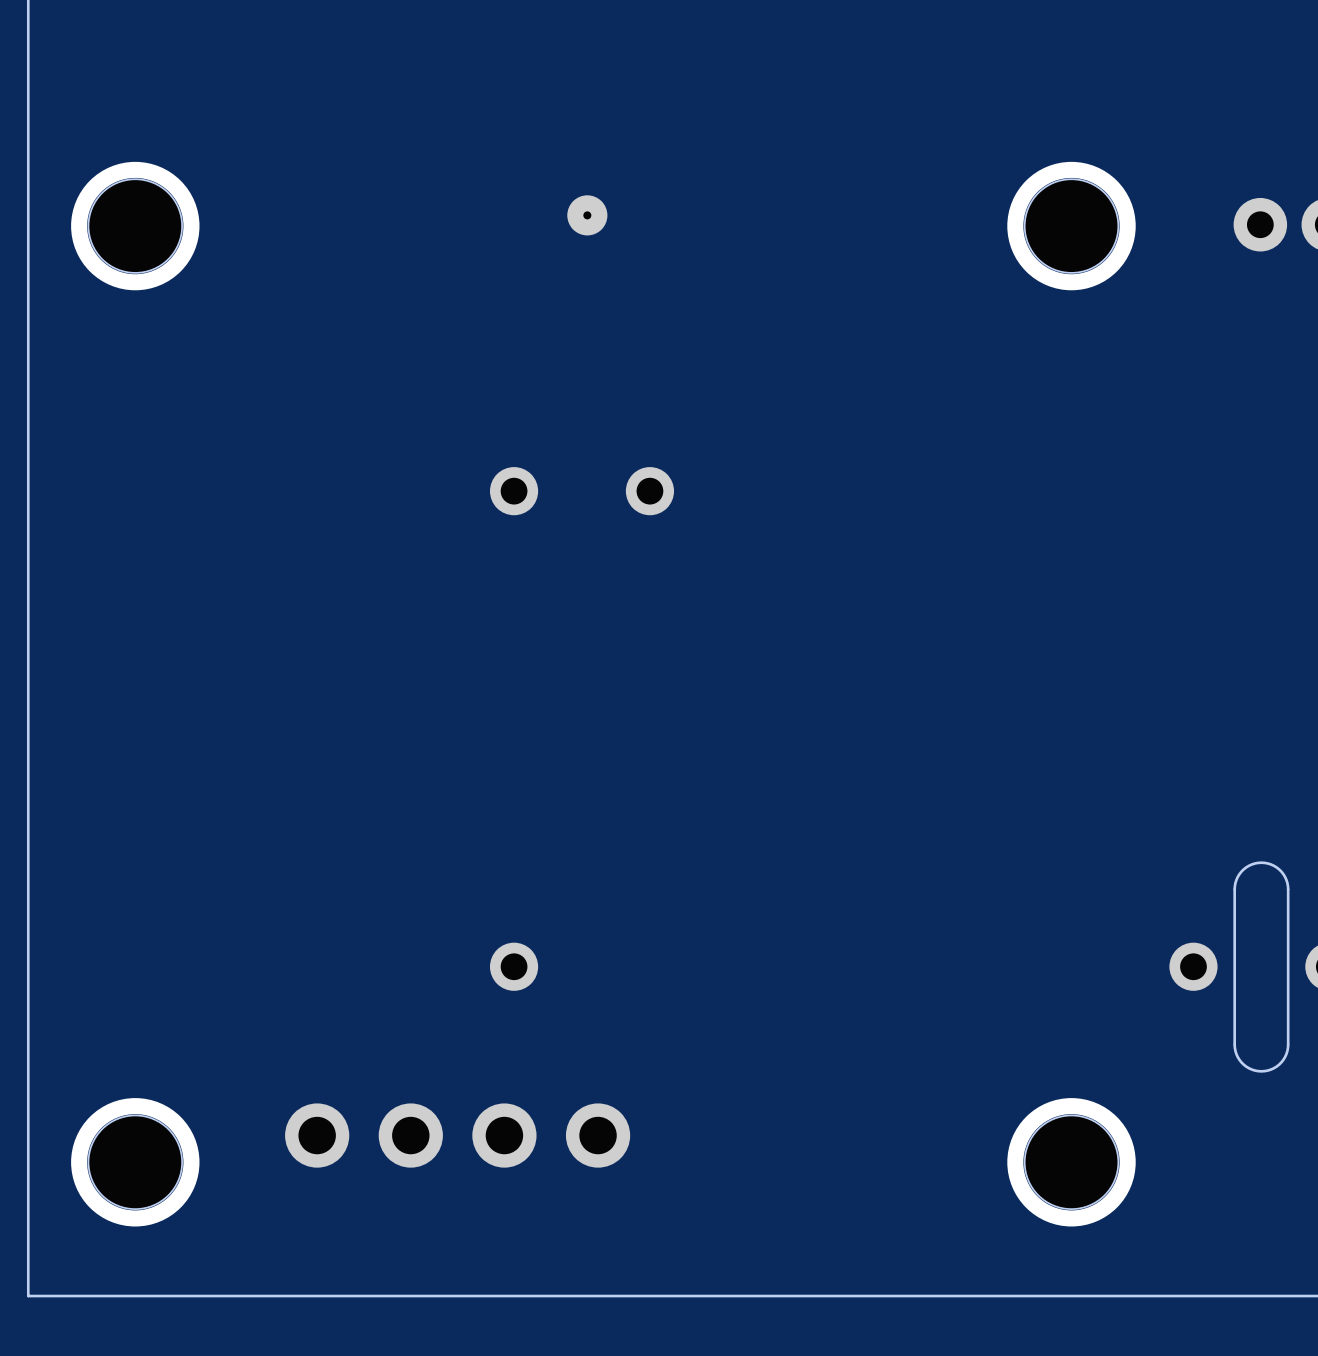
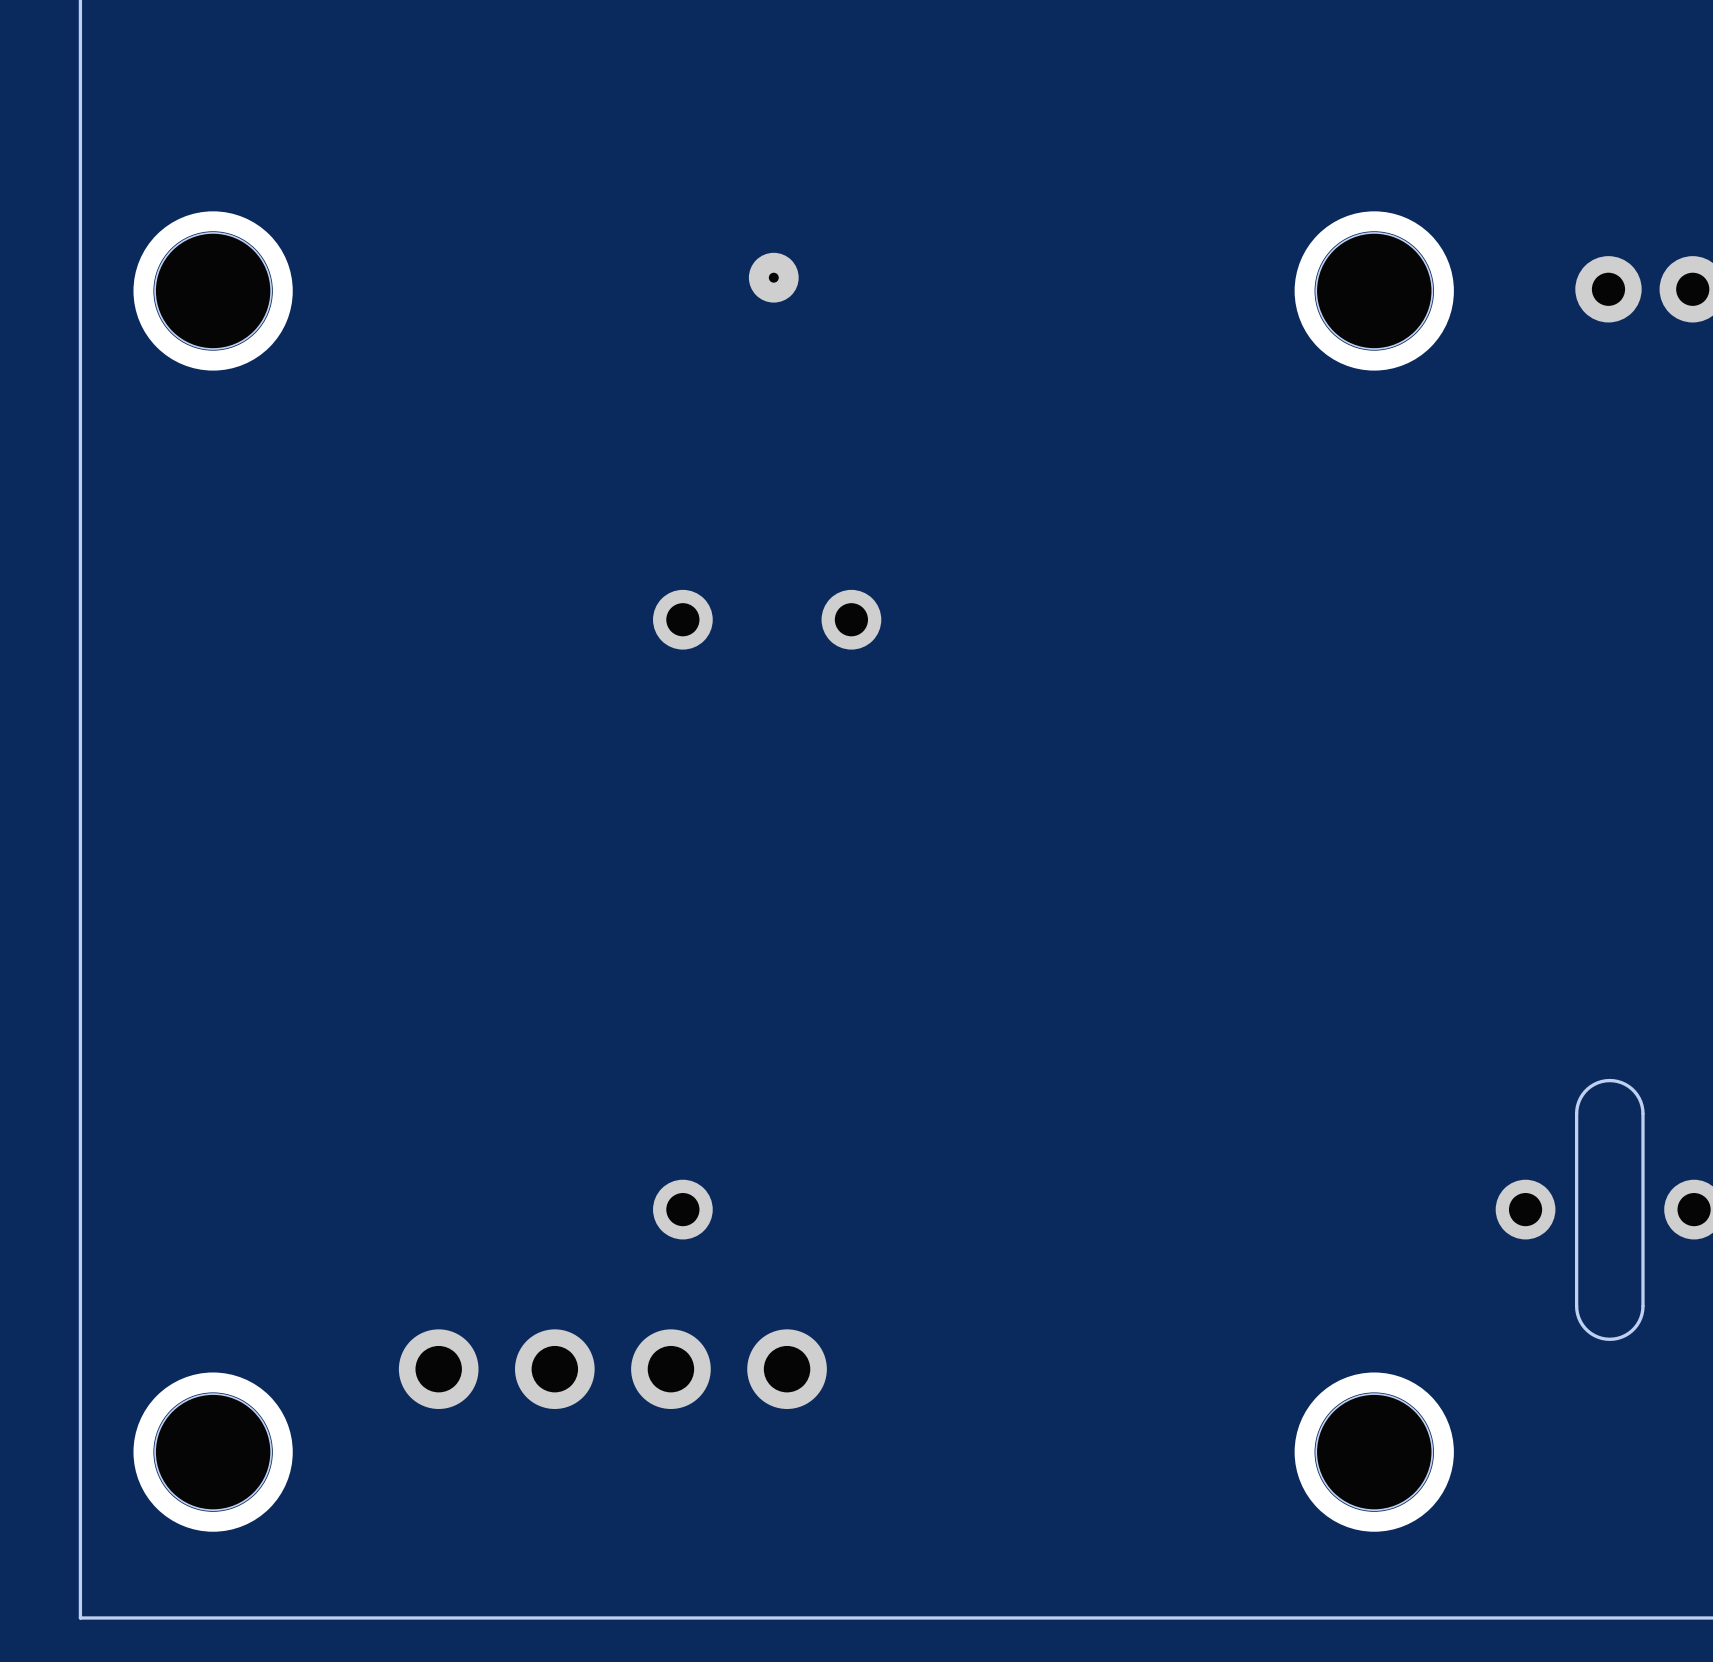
part position: (457, 1135) -> (612, 1369)

